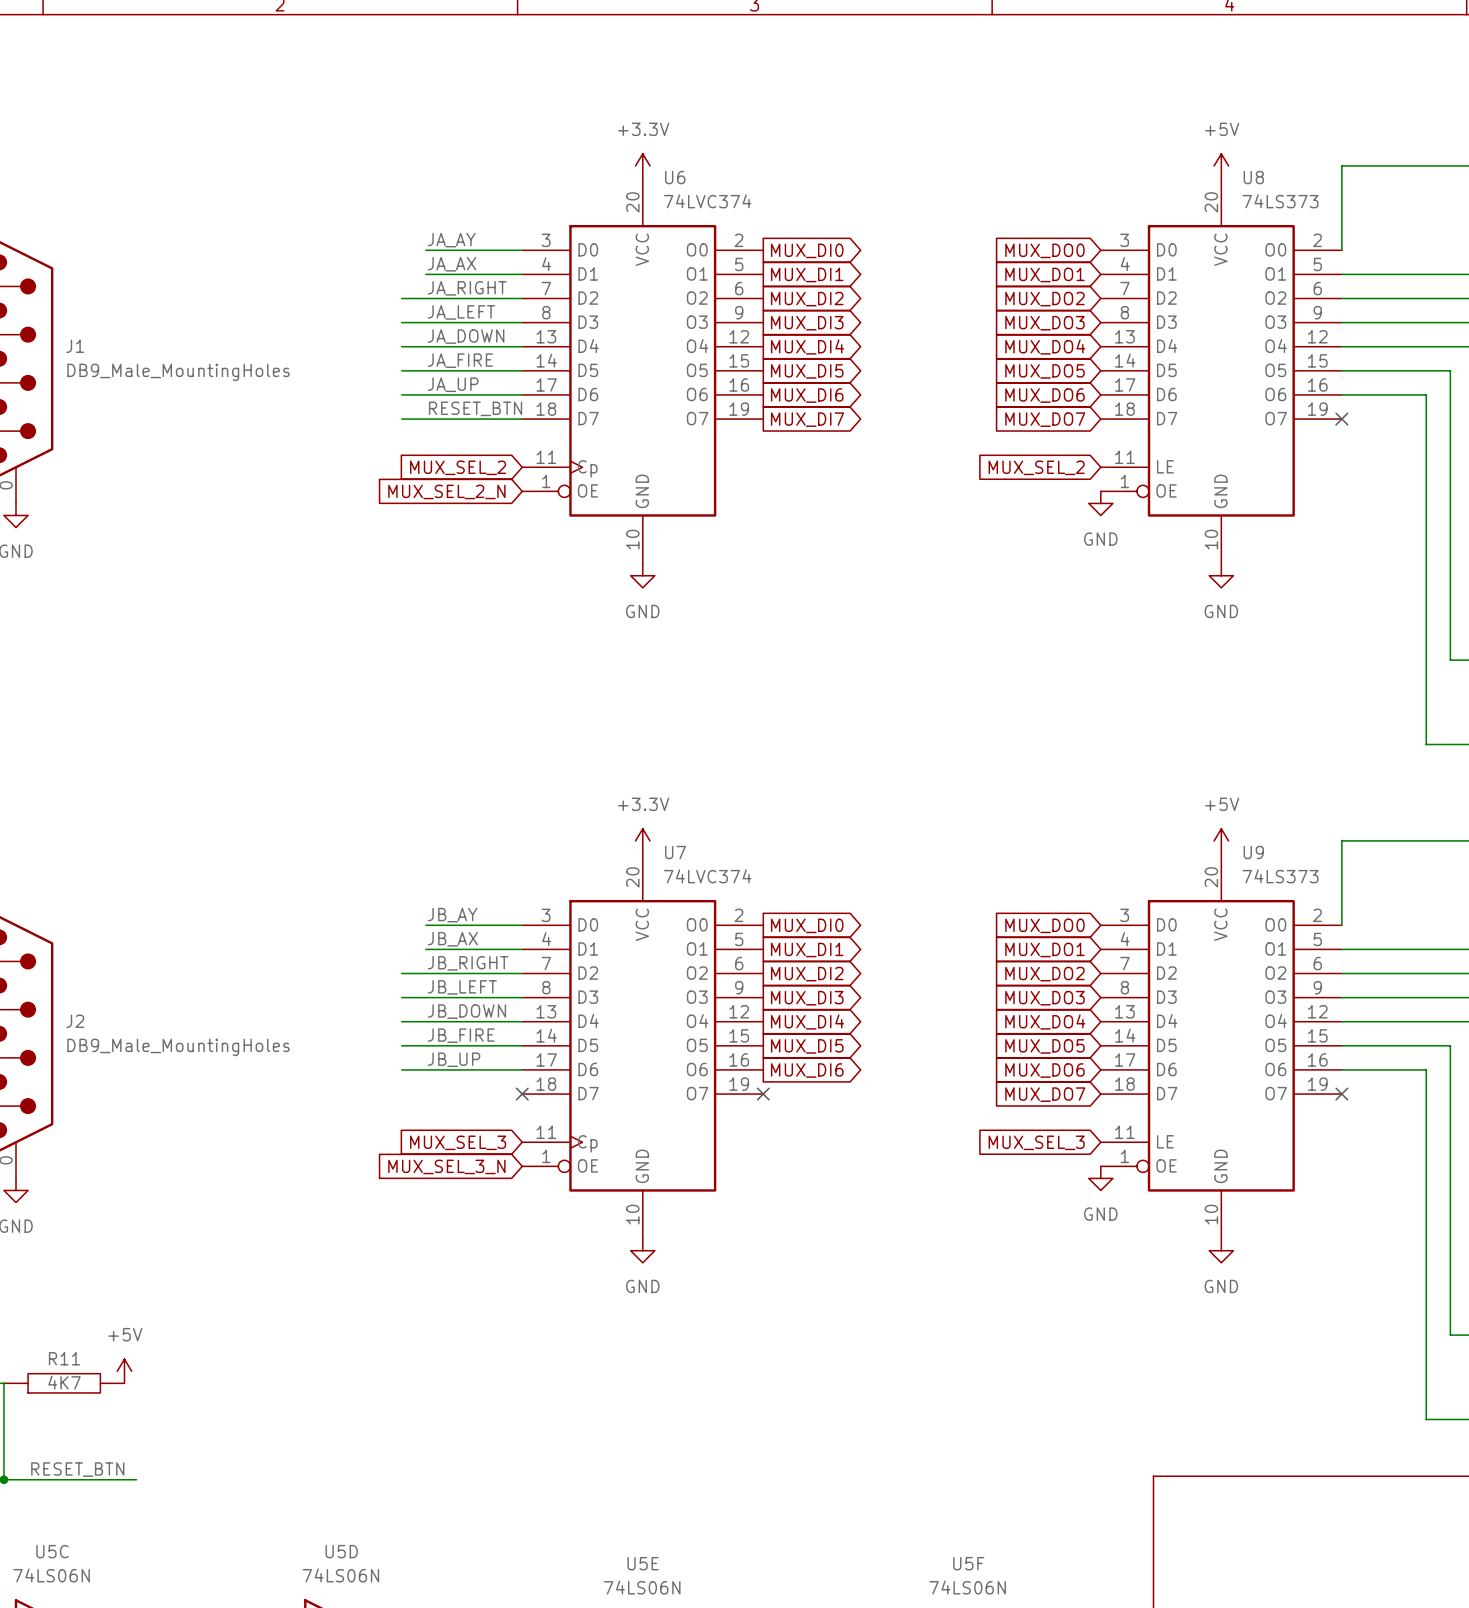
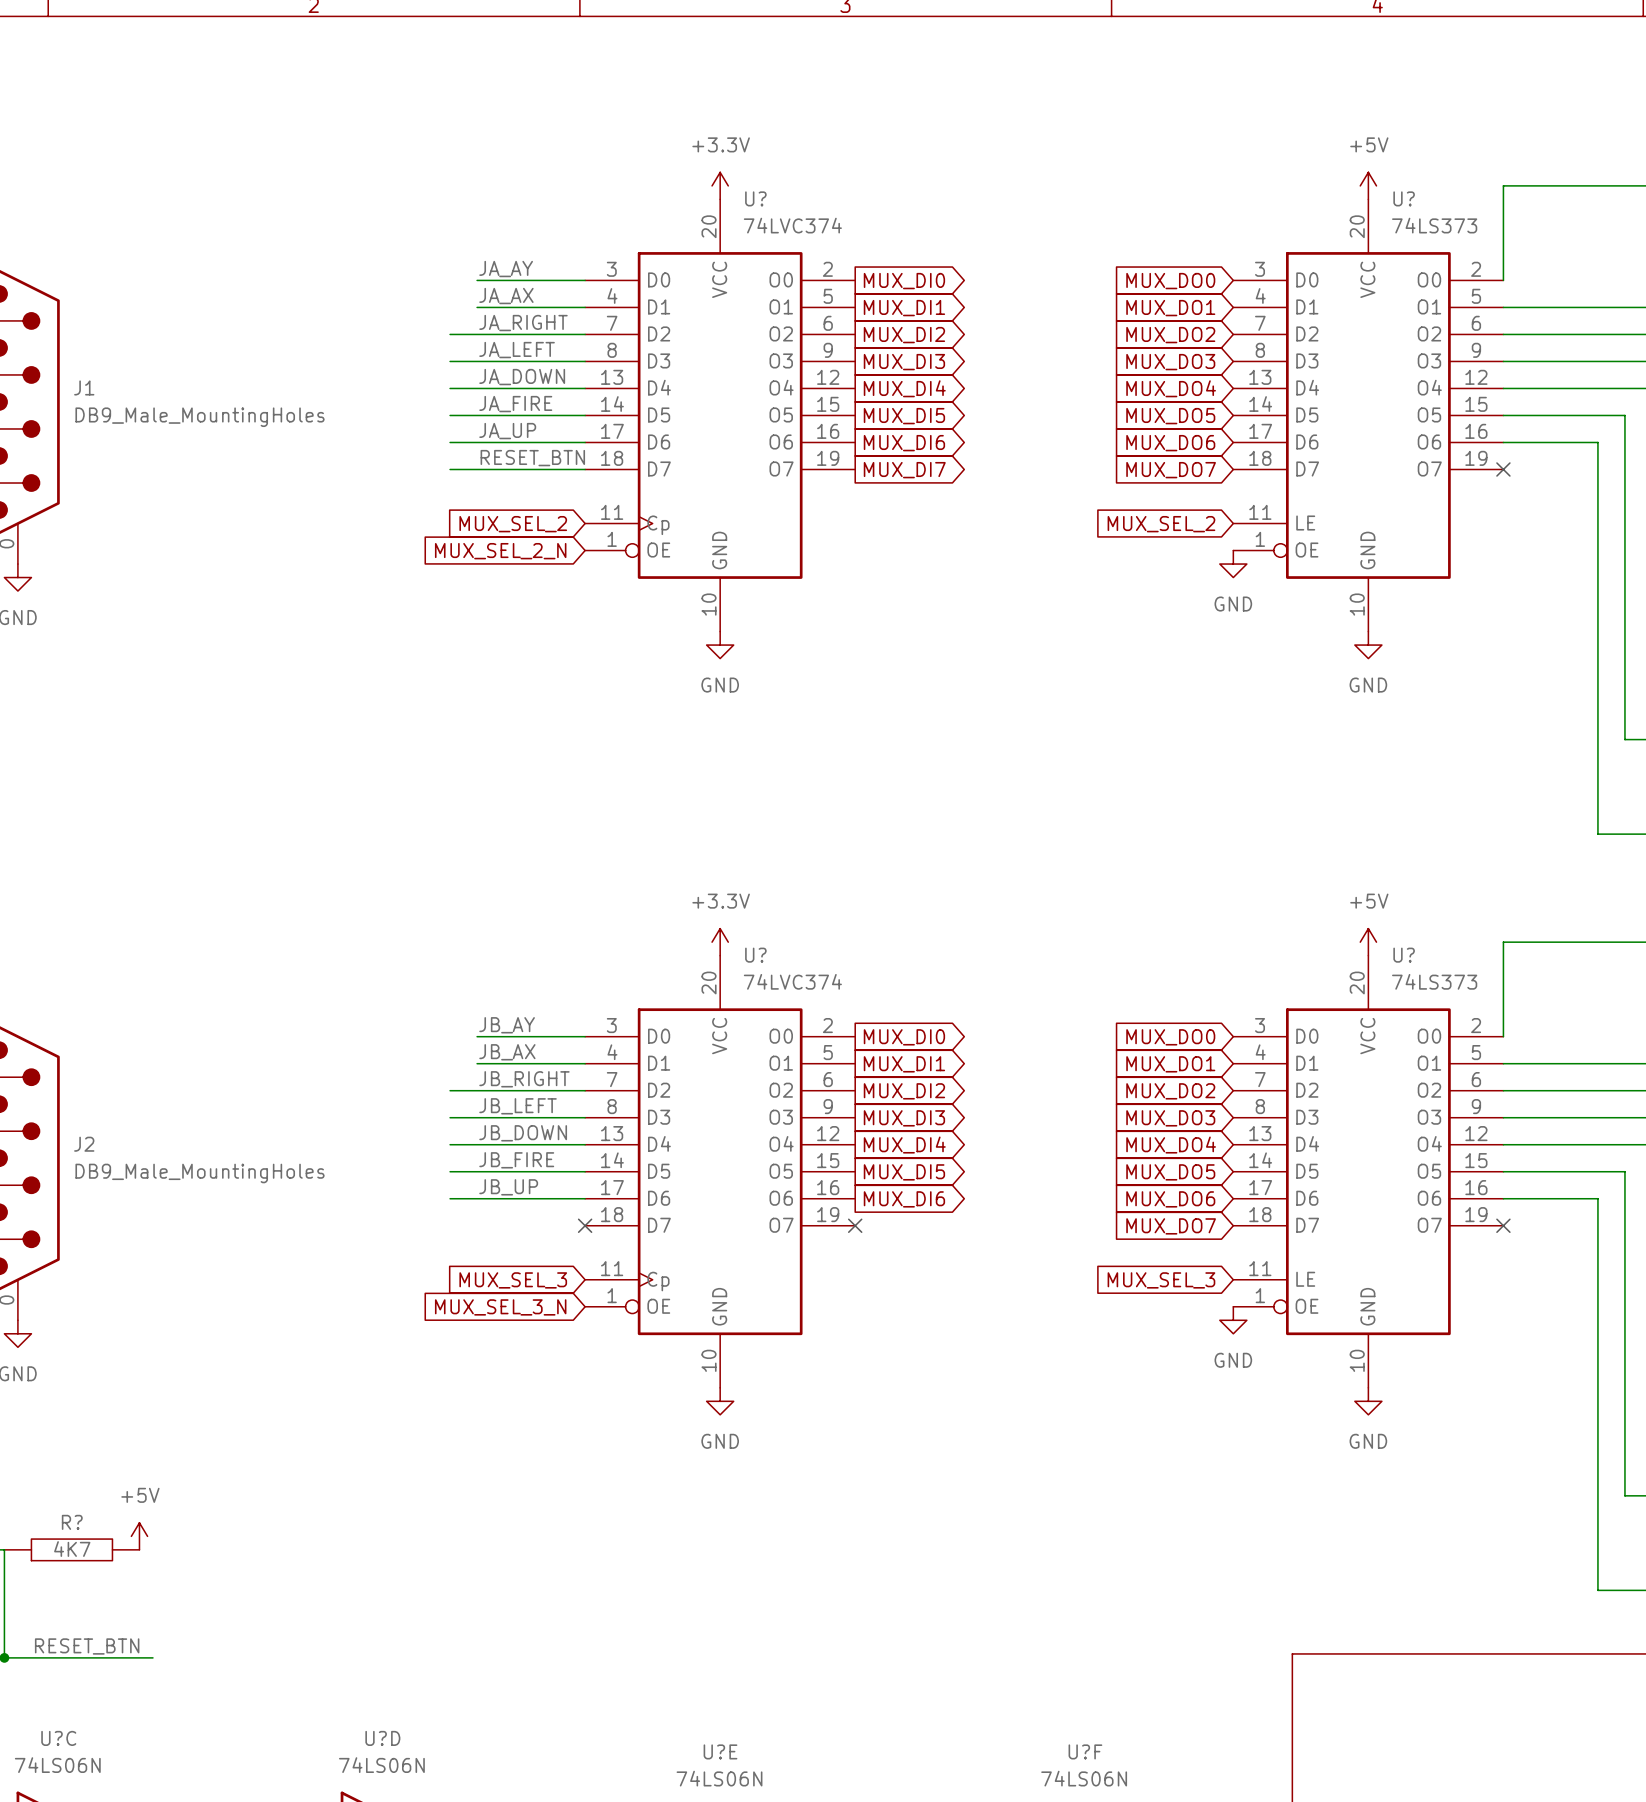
U6 name: U6 (675, 177) -> U? (755, 198)
U8 name: U8 (1253, 177) -> U? (1404, 198)
U7 name: U7 (675, 852) -> U? (755, 955)
U9 name: U9 (1253, 852) -> U? (1404, 955)
R11 name: R11 (64, 1358) -> R? (72, 1522)
U5C name: U5C (52, 1551) -> U?C (58, 1738)
U5D name: U5D (341, 1551) -> U?D (382, 1738)
U5E name: U5E (643, 1563) -> U?E (720, 1751)
U5F name: U5F (968, 1563) -> U?F (1085, 1751)

